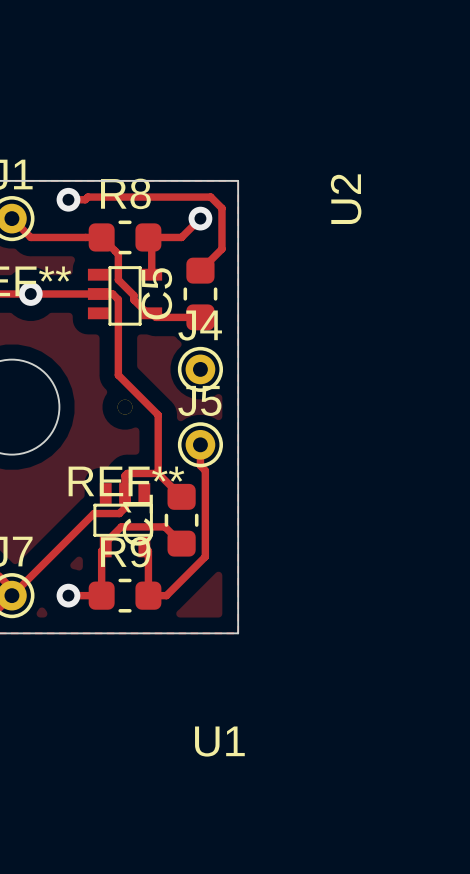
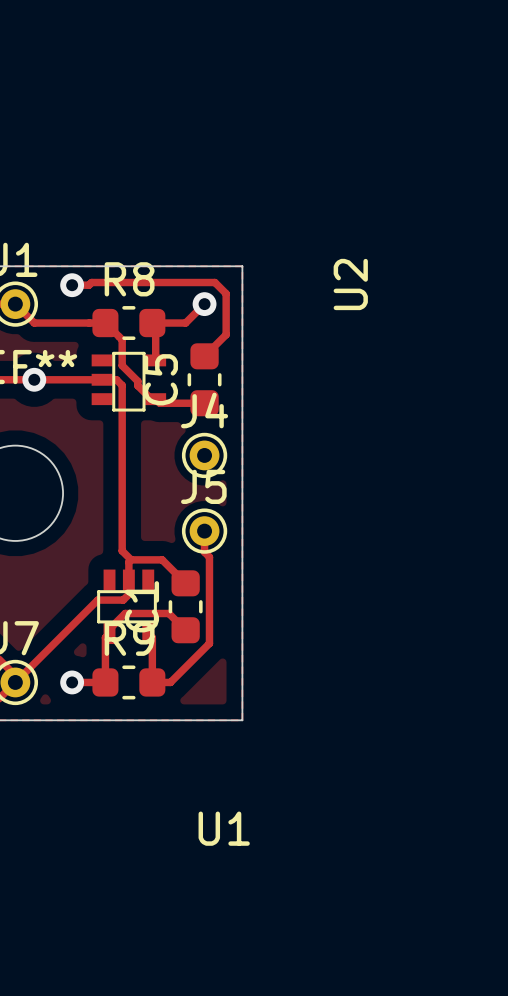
track: (118, 375) (158, 415) (158, 473) -> (122, 461) (122, 550) (131, 559)
REF**: (125, 407) -> none

